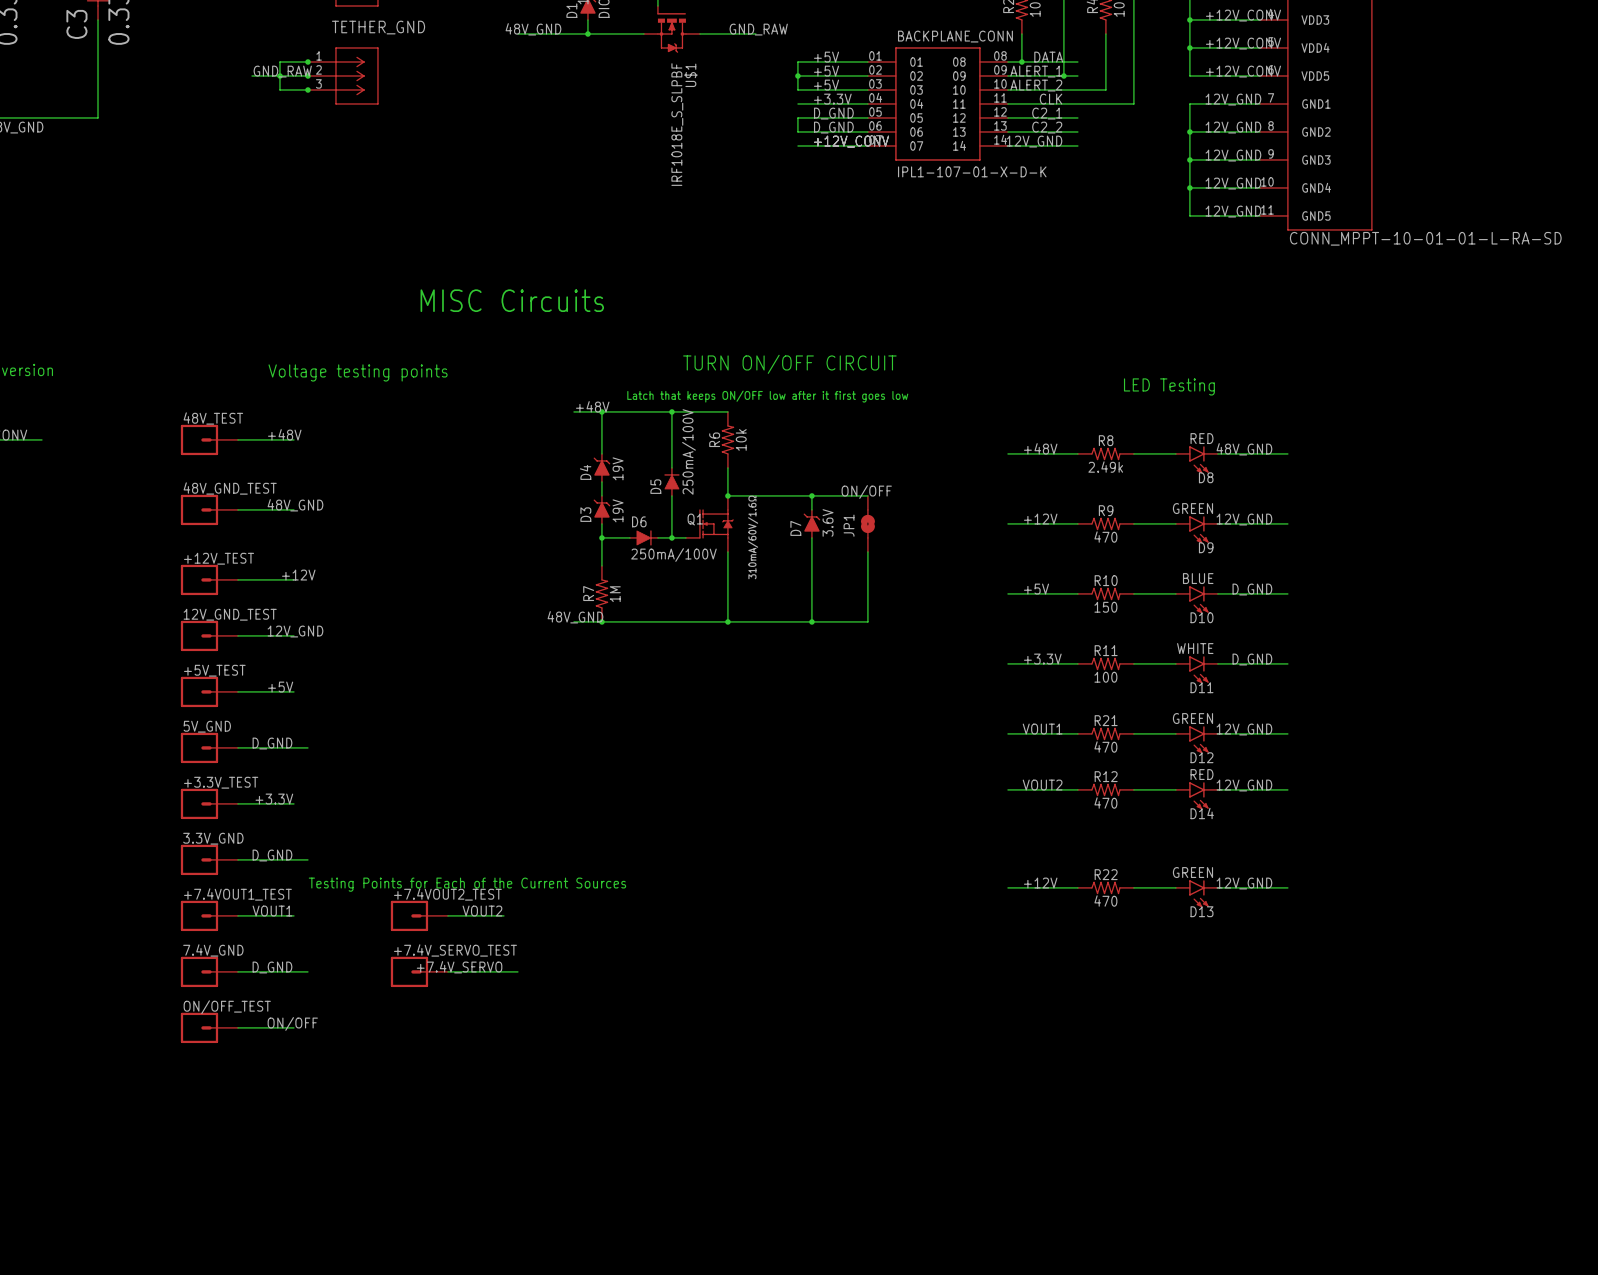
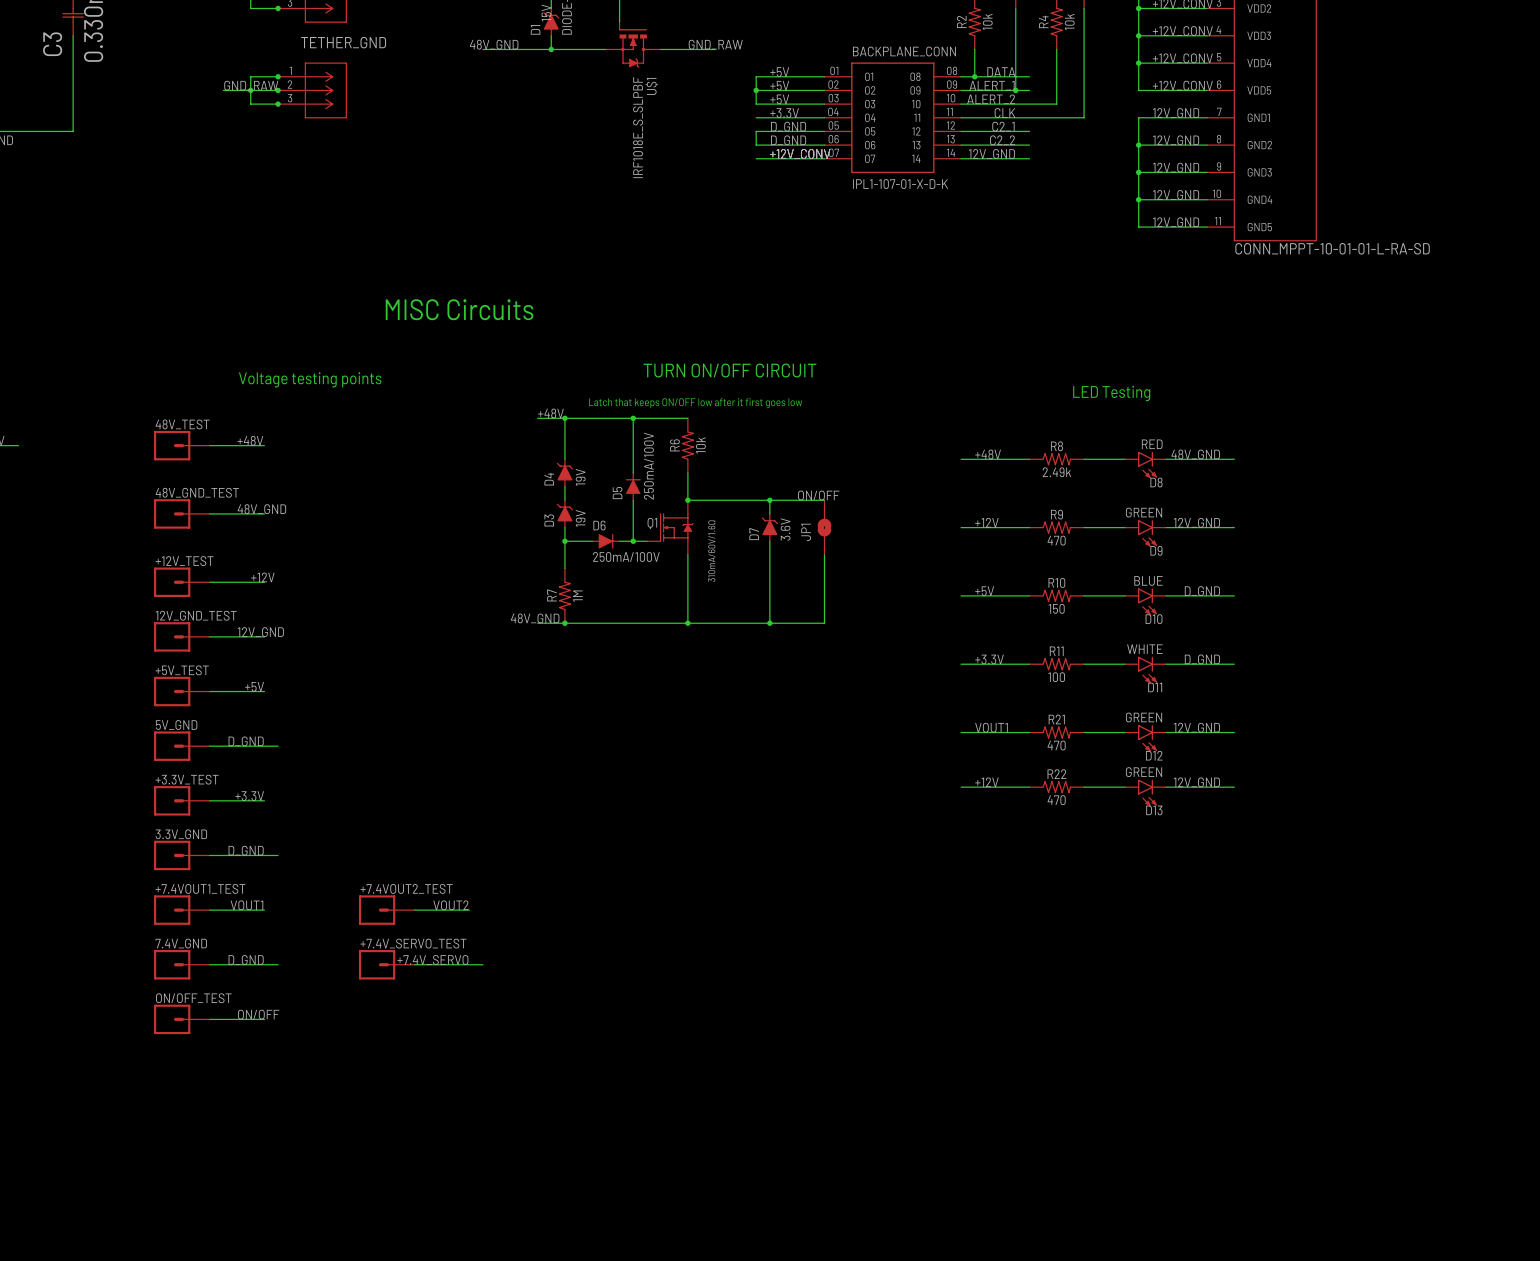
D14 value: RED (1202, 774) -> GREEN (1144, 772)
R12 name: R12 (1106, 776) -> R22 (1056, 774)
label: VOUT2 (1042, 785) -> +12V (986, 782)
D14 name: D14 (1202, 813) -> D13 (1154, 810)
label: +12V (1040, 883) -> none
label: 12V_GND (1244, 883) -> none
text: Testing Points for Each of the Current Sources (467, 884) -> none
wire: (1007, 887) (1077, 887) -> none
R22: 470 (1105, 887) -> none
wire: (1133, 887) (1175, 887) -> none
wire: (1217, 887) (1287, 887) -> none
D13: GREEN (1196, 893) -> none

